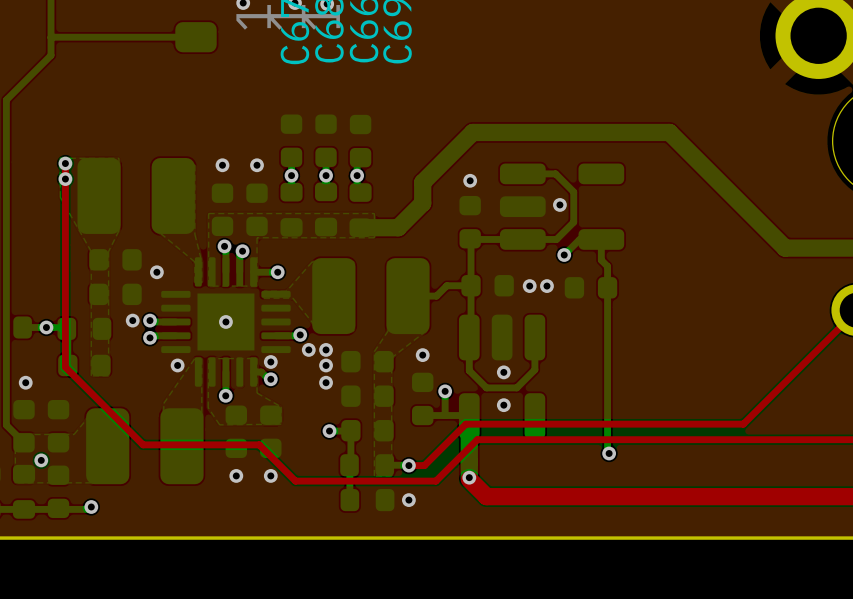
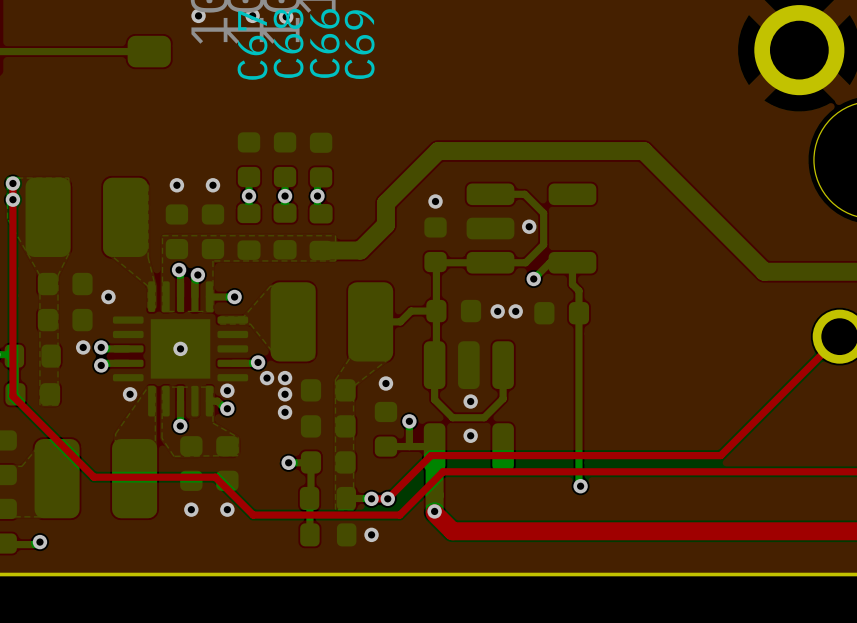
via: none -> (387, 498)

